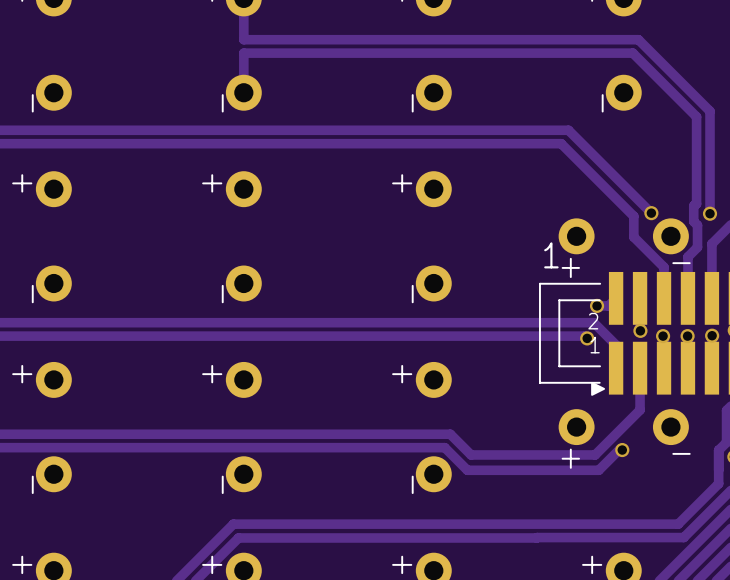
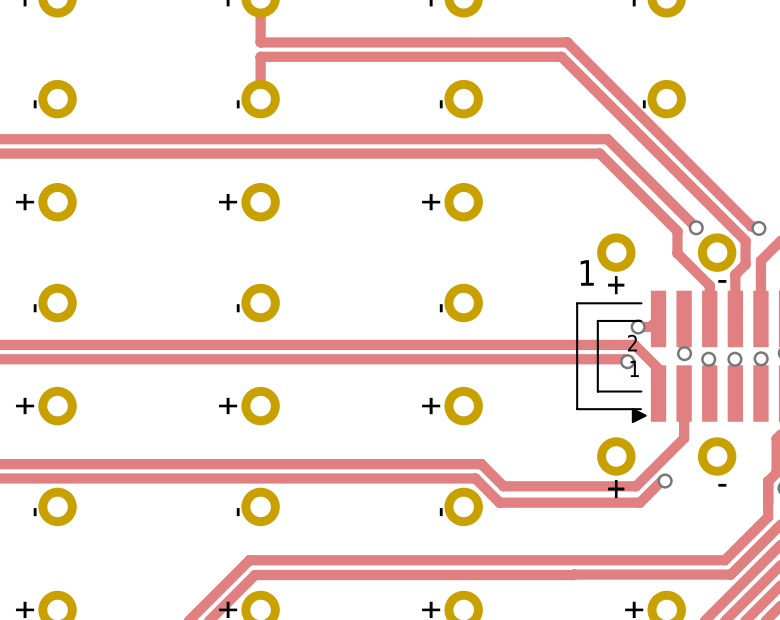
track: (530, 39) (638, 39) (710, 111) (710, 213) -> (567, 42) (751, 226) (754, 226)
track: (525, 53) (632, 53) (696, 116) (696, 204) (693, 205) (693, 221) -> (561, 56) (741, 236)

